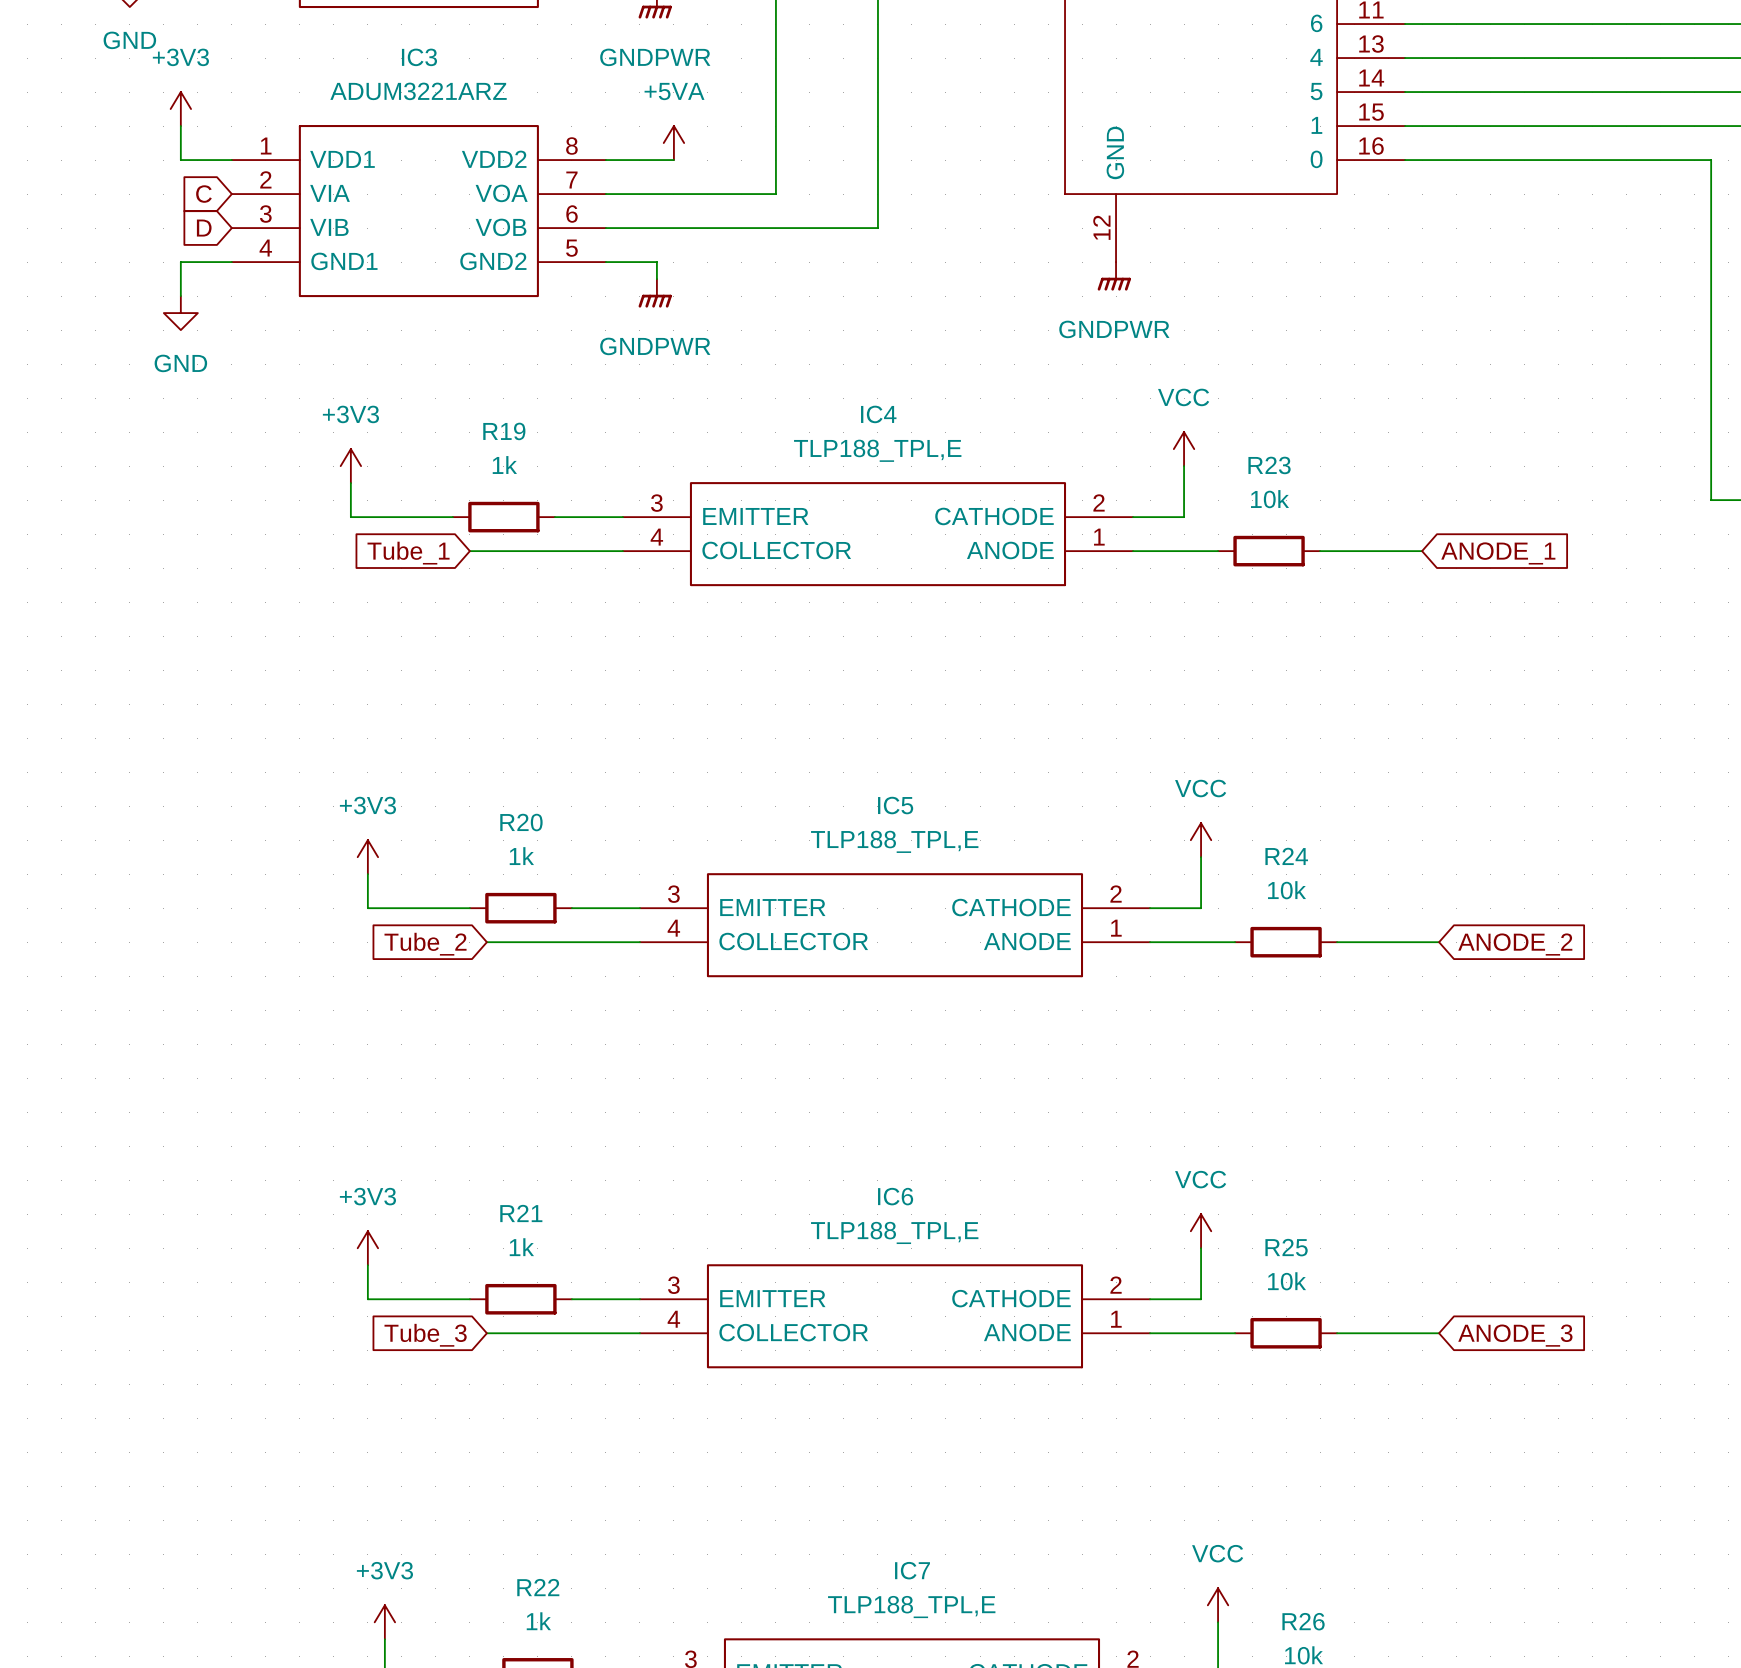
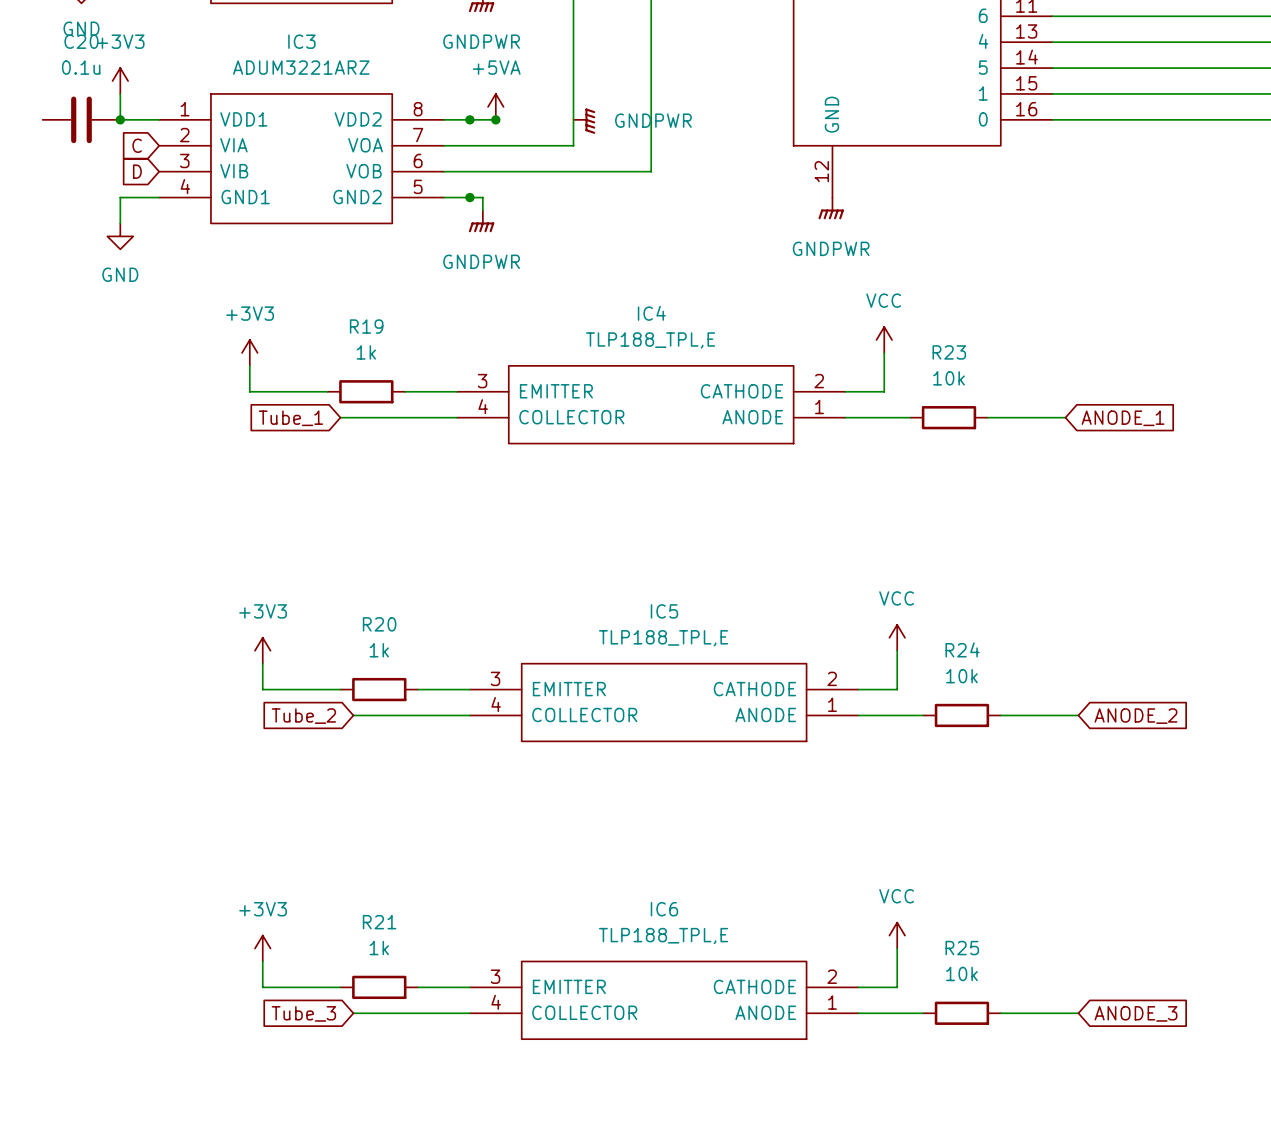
C20: none -> 0.1u (81, 119)
junction: none -> (120, 119)
junction: none -> (469, 119)
junction: none -> (495, 119)
power symbol: none -> GNDPWR (584, 121)
junction: none -> (469, 197)

